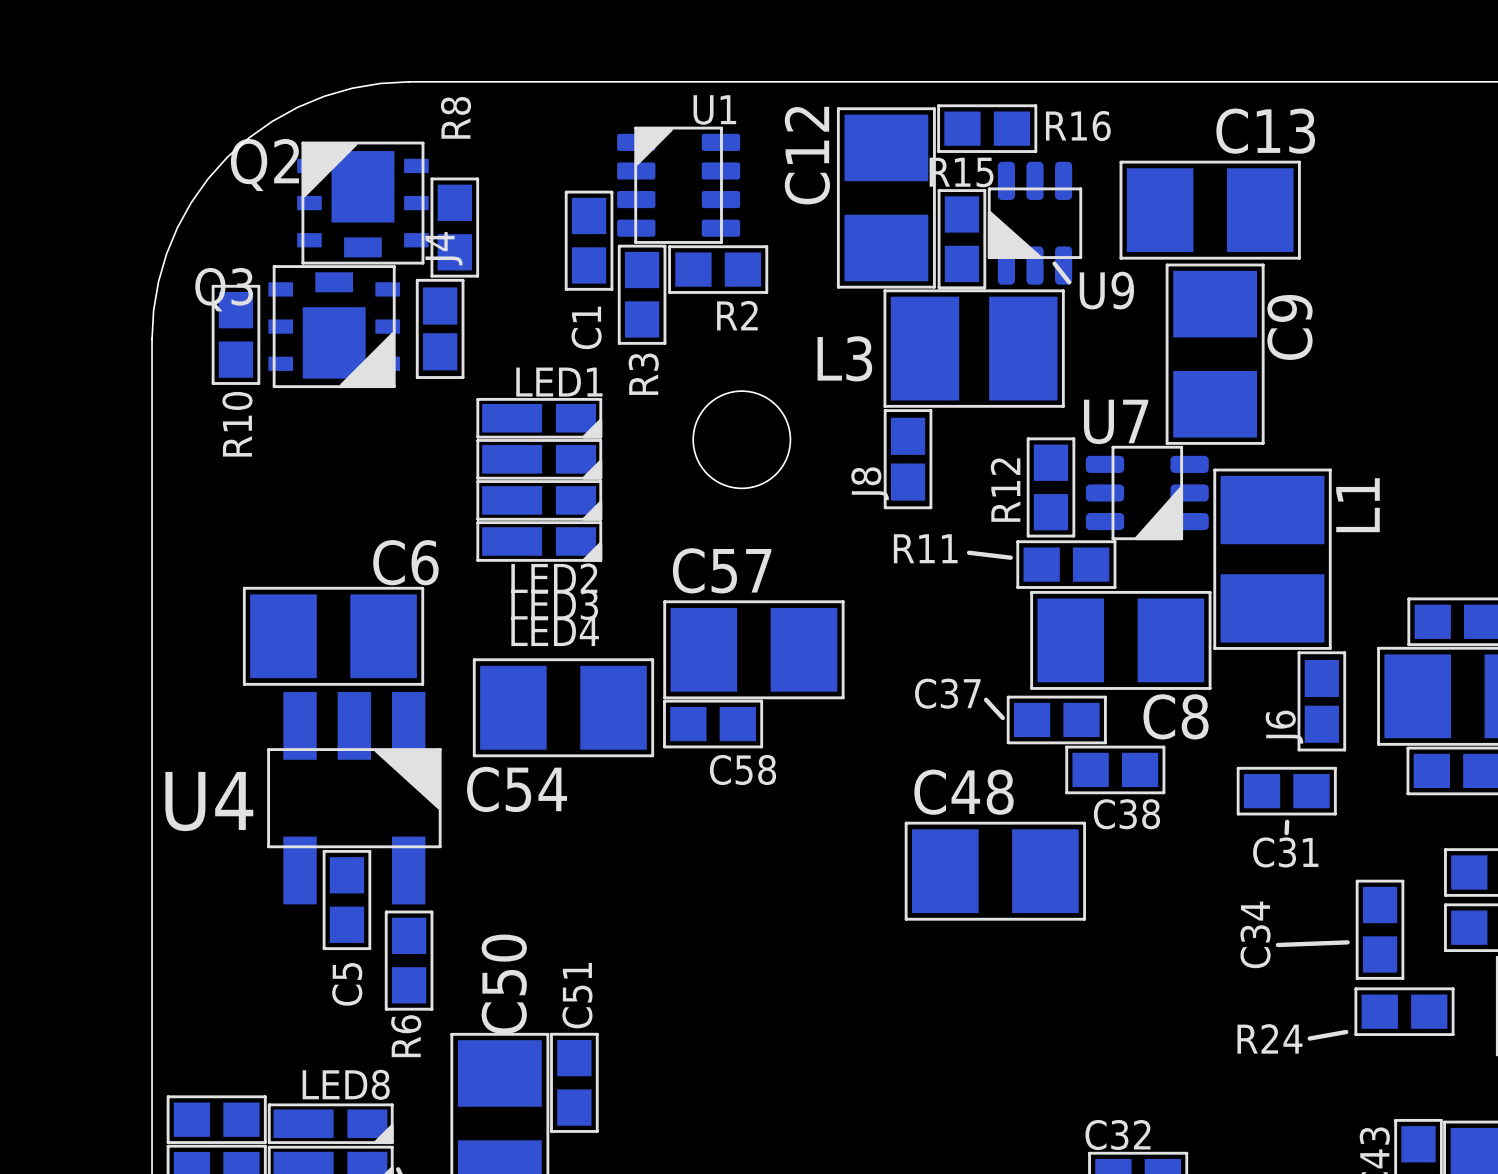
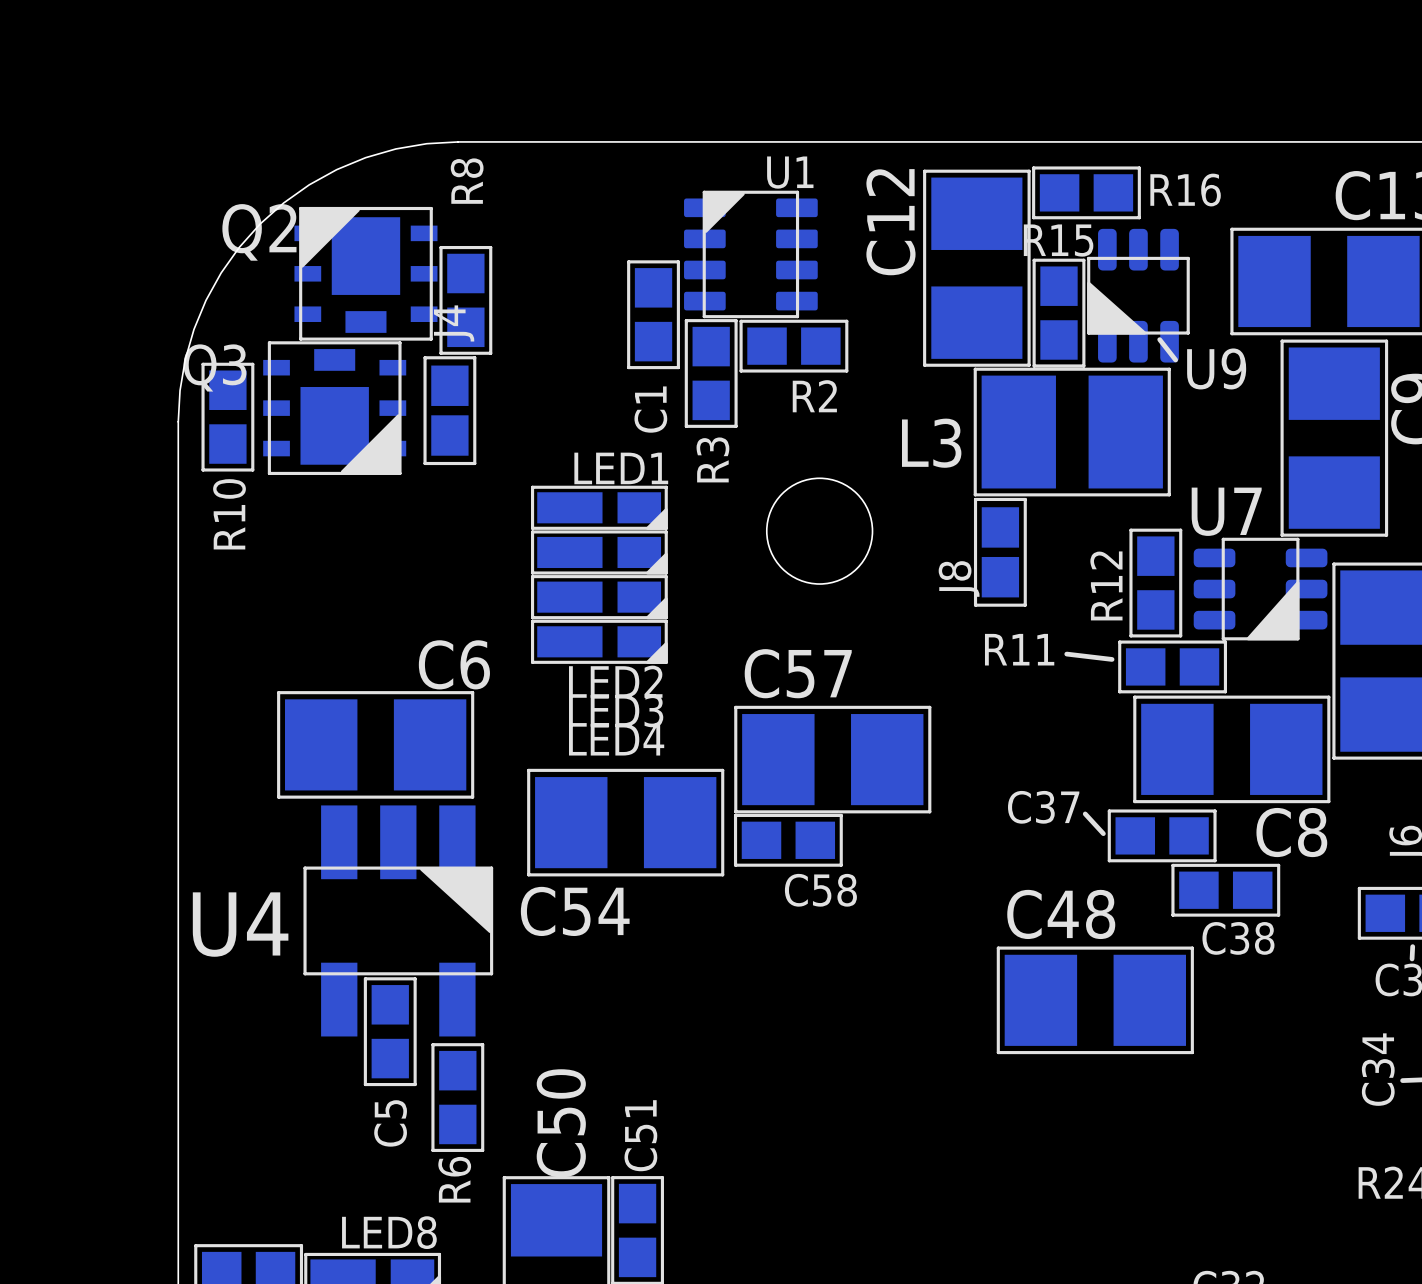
Q2 position: (362, 203) -> (365, 273)
R8 position: (454, 227) -> (465, 300)
Q3 position: (334, 326) -> (334, 408)
J4 position: (440, 328) -> (449, 410)
R10 position: (235, 334) -> (227, 417)

